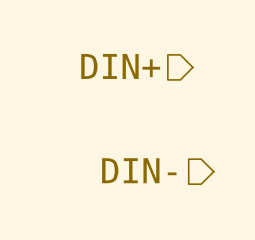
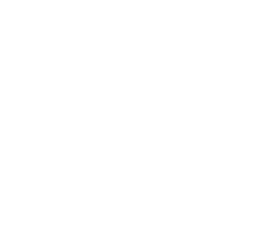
hierarchical label: DIN+ (120, 66) -> none
hierarchical label: DIN- (139, 170) -> none

